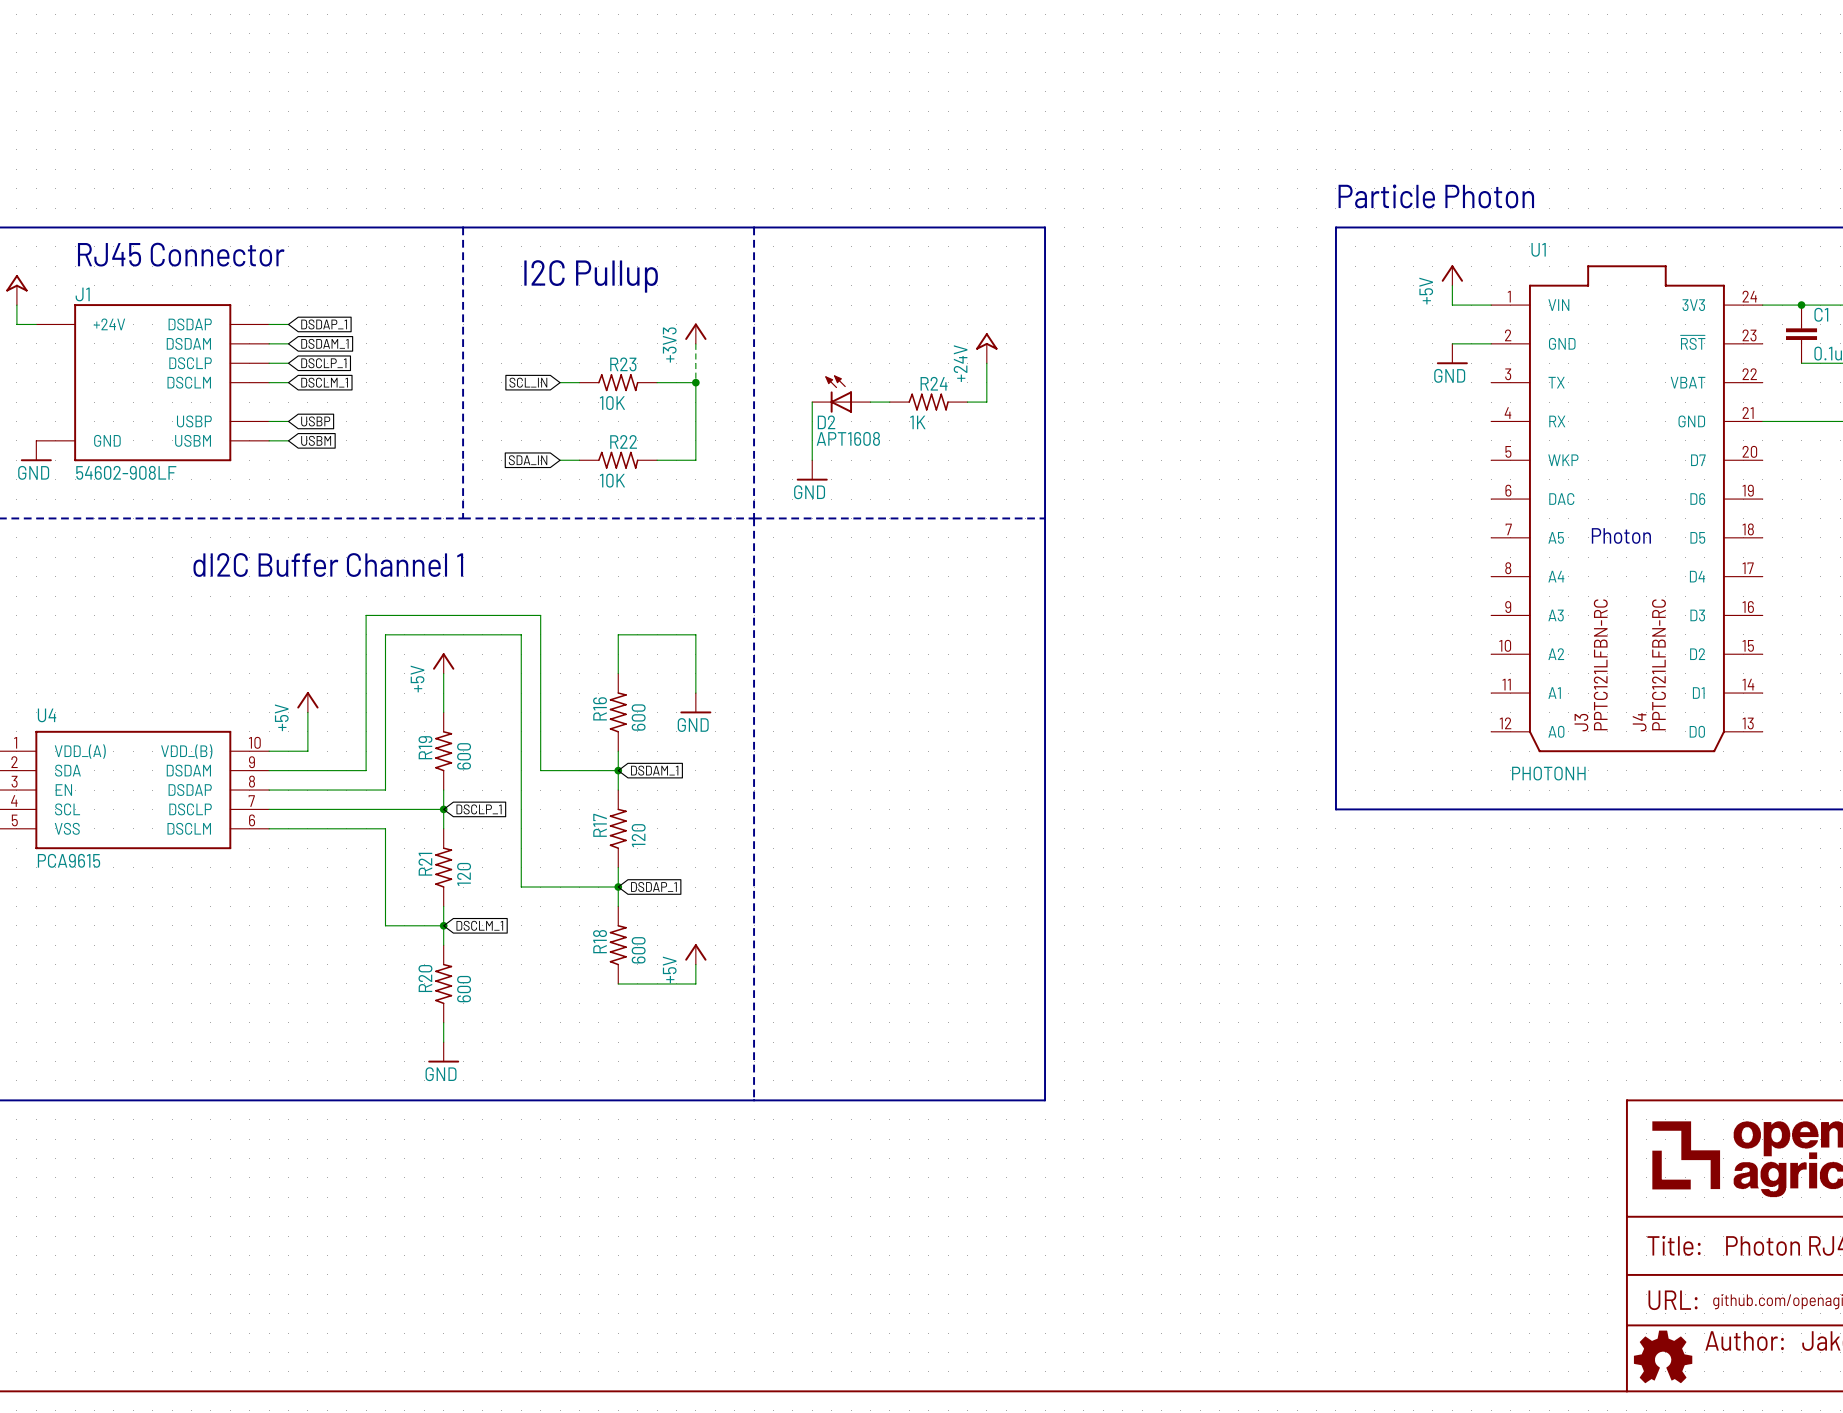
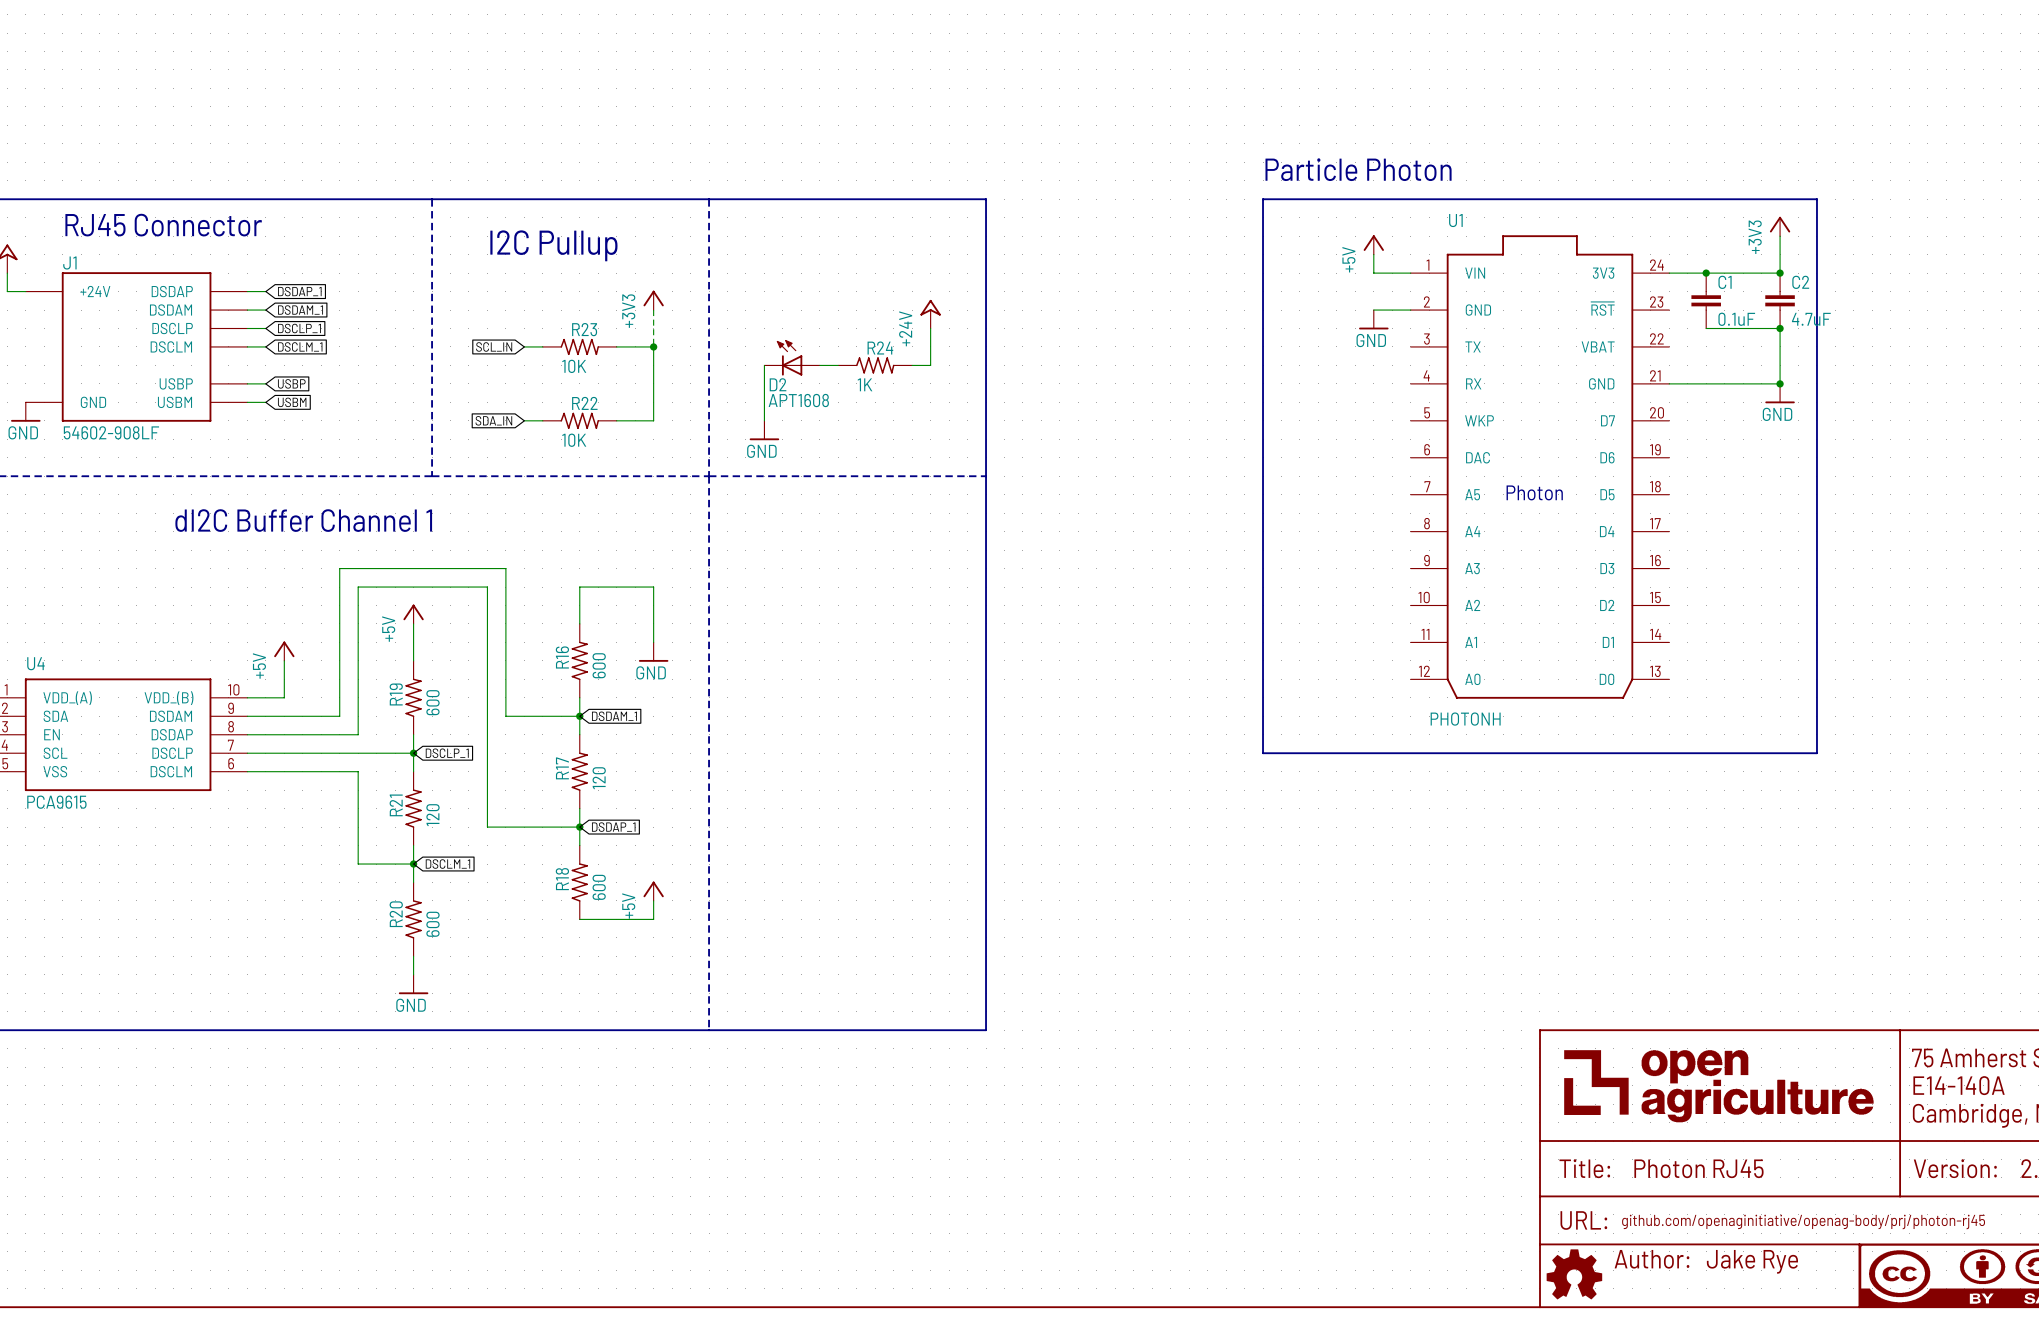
J3: PPTC121LFBN-RC (1591, 665) -> none
J4: PPTC121LFBN-RC (1649, 665) -> none

